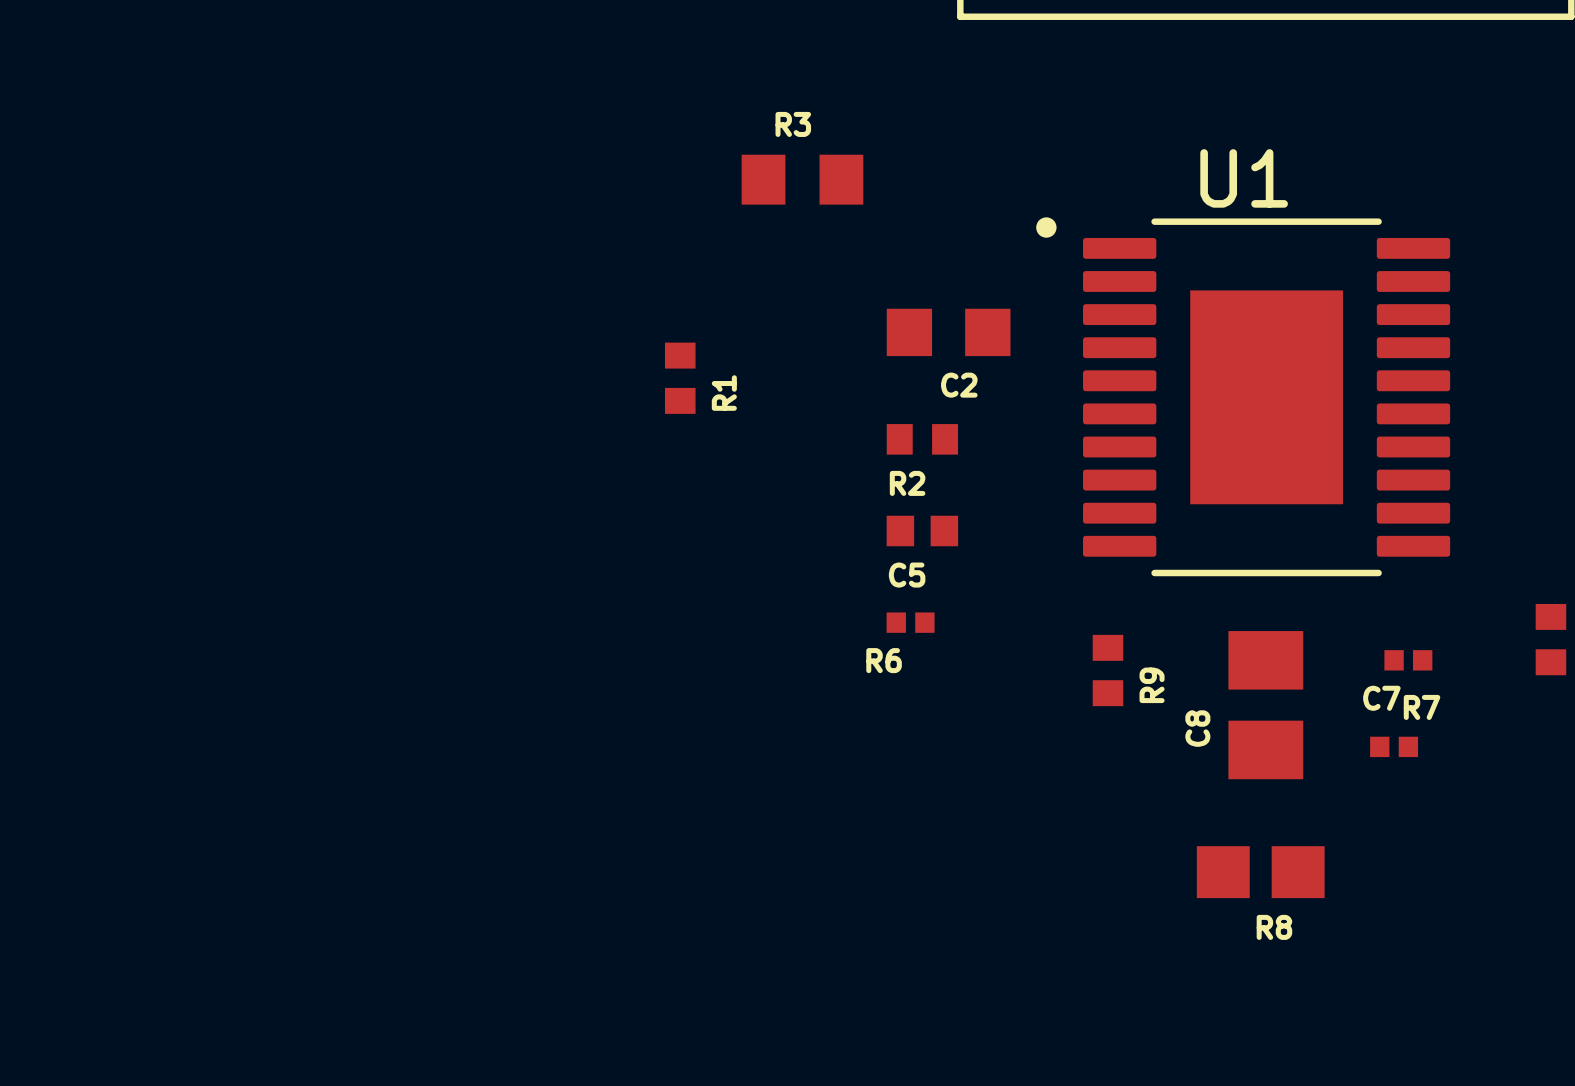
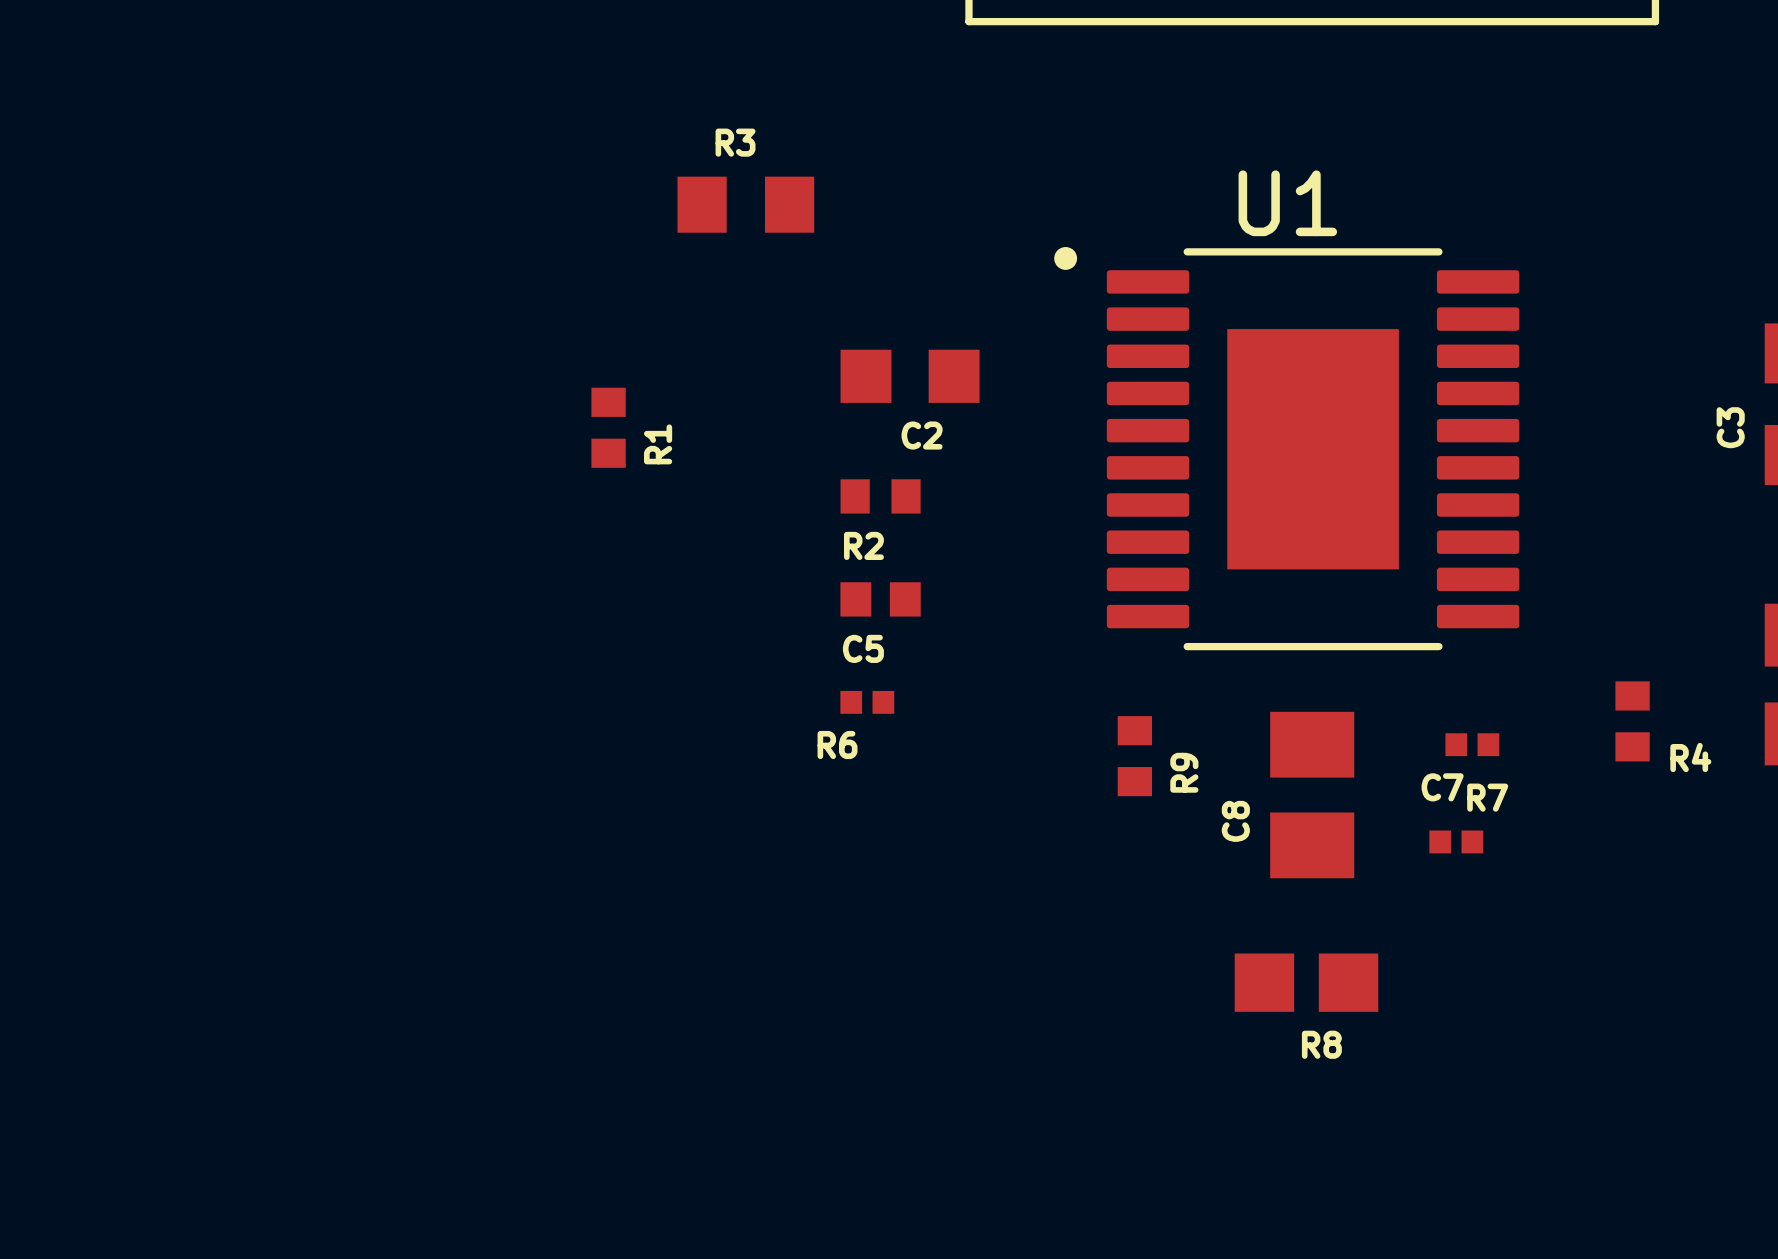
R3 position: (802, 179) -> (745, 204)
C2 position: (948, 332) -> (910, 376)
R1 position: (680, 378) -> (608, 427)
R2 position: (922, 439) -> (880, 496)
C5 position: (922, 530) -> (880, 599)
R6 position: (910, 622) -> (867, 702)

